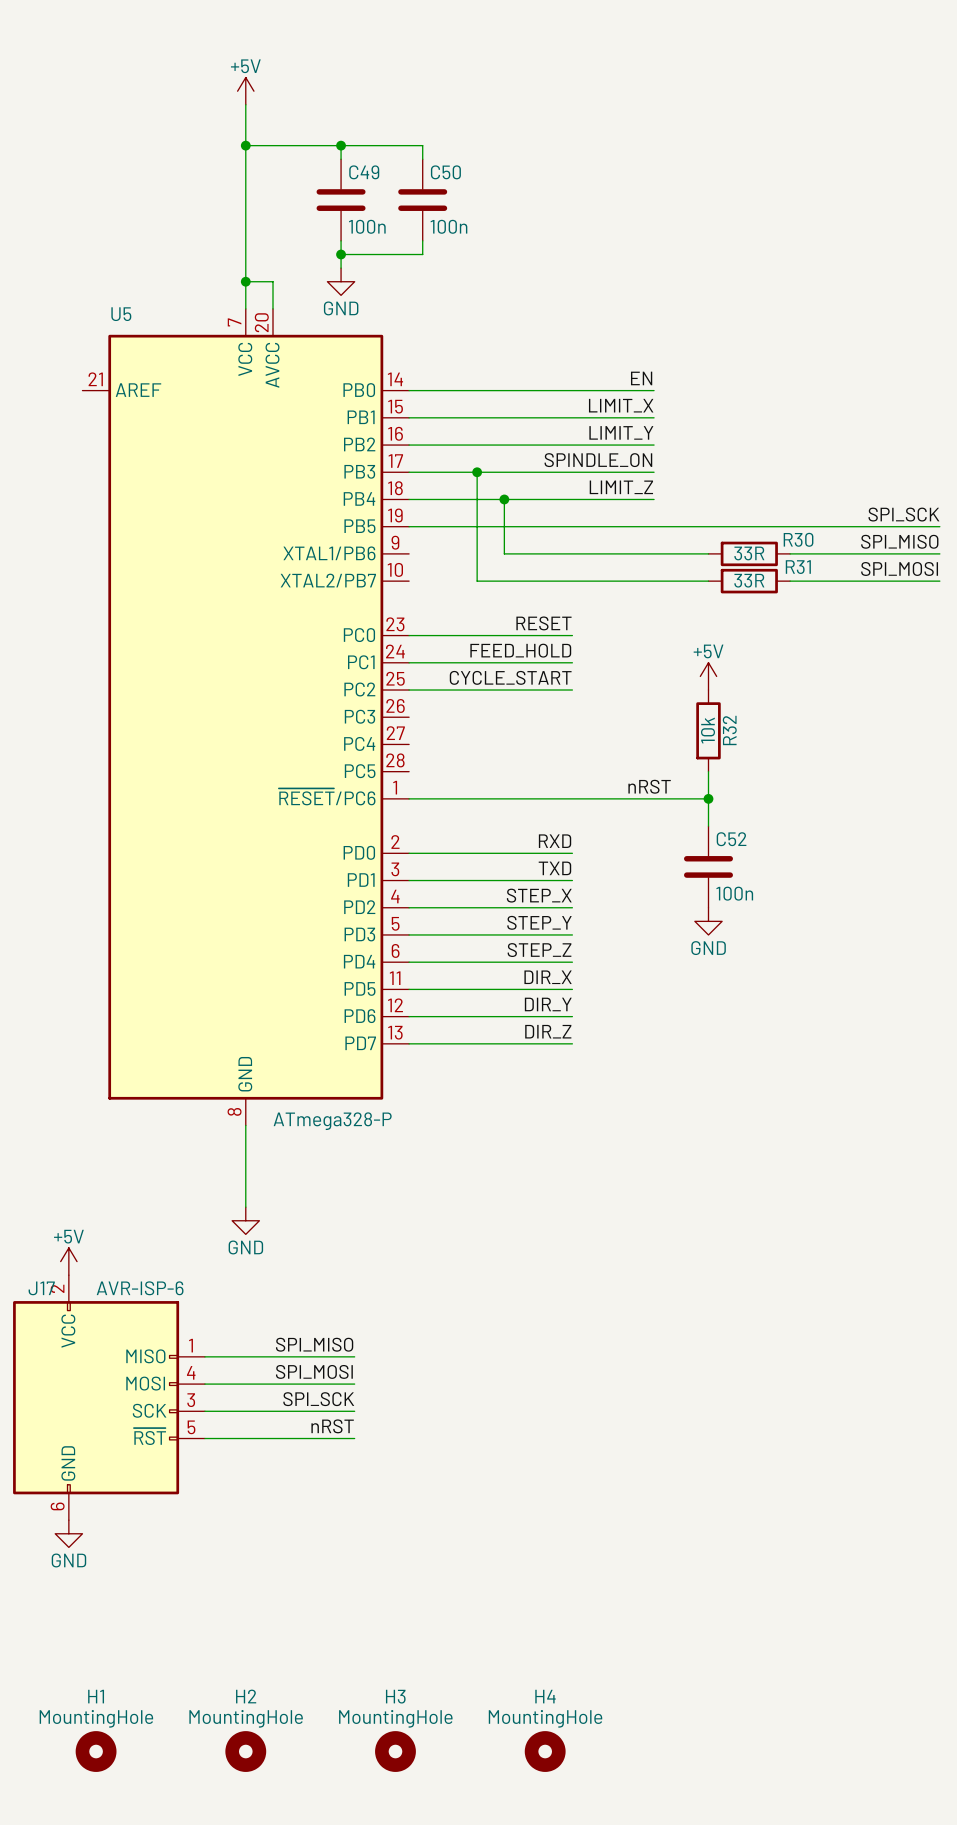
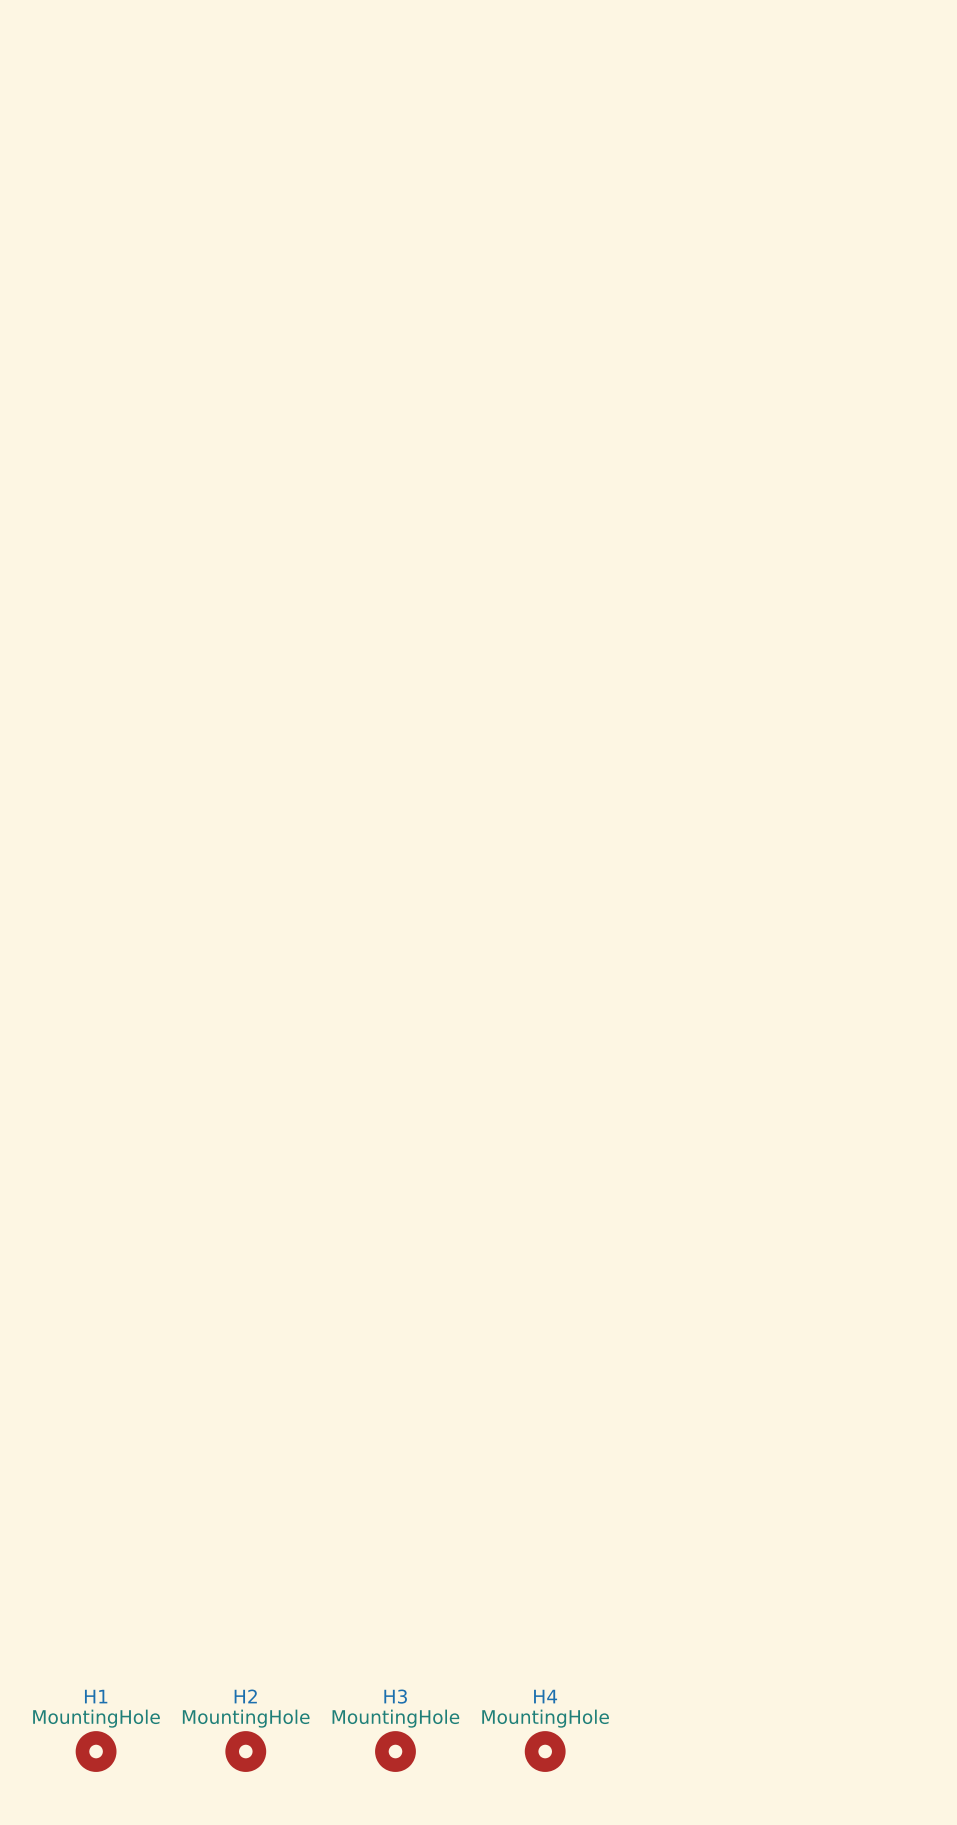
power symbol: +5V (245, 91) -> none
wire: (245, 104) (245, 308) -> none
wire: (245, 145) (422, 145) (422, 159) -> none
junction: (245, 145) -> none
wire: (341, 145) (341, 159) -> none
junction: (341, 145) -> none
C49: 100n (341, 200) -> none
C50: 100n (422, 200) -> none
wire: (341, 240) (341, 268) -> none
wire: (422, 240) (422, 254) (341, 254) -> none
junction: (341, 254) -> none
wire: (245, 281) (273, 281) (273, 308) -> none
junction: (245, 281) -> none
power symbol: GND (341, 281) -> none
label: EN (641, 378) -> none
wire: (409, 390) (654, 390) -> none
label: LIMIT_X (621, 405) -> none
wire: (409, 417) (654, 417) -> none
label: LIMIT_Y (621, 432) -> none
wire: (409, 445) (654, 445) -> none
label: SPINDLE_ON (598, 460) -> none
wire: (409, 472) (654, 472) -> none
wire: (477, 472) (477, 581) (708, 581) -> none
junction: (477, 472) -> none
label: LIMIT_Z (621, 487) -> none
wire: (409, 499) (654, 499) -> none
wire: (504, 499) (504, 553) (708, 553) -> none
junction: (504, 499) -> none
label: SPI_SCK (903, 514) -> none
wire: (409, 526) (939, 526) -> none
label: SPI_MISO (899, 541) -> none
R30: 33R (749, 553) -> none
wire: (790, 553) (939, 553) -> none
label: SPI_MOSI (899, 568) -> none
R31: 33R (749, 581) -> none
wire: (790, 581) (939, 581) -> none
label: RESET (543, 623) -> none
wire: (409, 635) (572, 635) -> none
label: FEED_HOLD (520, 650) -> none
wire: (409, 662) (572, 662) -> none
power symbol: +5V (708, 676) -> none
label: CYCLE_START (510, 677) -> none
wire: (409, 690) (572, 690) -> none
U5: ATmega328-P (245, 717) -> none
R32: 10k (708, 730) -> none
wire: (708, 771) (708, 826) -> none
label: nRST (649, 786) -> none
wire: (409, 798) (708, 798) -> none
junction: (708, 798) -> none
label: RXD (555, 841) -> none
wire: (409, 853) (572, 853) -> none
C52: 100n (708, 866) -> none
label: TXD (554, 868) -> none
wire: (409, 880) (572, 880) -> none
label: STEP_X (539, 895) -> none
wire: (409, 907) (572, 907) -> none
power symbol: GND (708, 921) -> none
label: STEP_Y (539, 922) -> none
wire: (409, 934) (572, 934) -> none
label: STEP_Z (539, 950) -> none
wire: (409, 962) (572, 962) -> none
label: DIR_X (548, 977) -> none
wire: (409, 989) (572, 989) -> none
label: DIR_Y (548, 1004) -> none
wire: (409, 1016) (572, 1016) -> none
label: DIR_Z (548, 1031) -> none
wire: (409, 1043) (572, 1043) -> none
wire: (245, 1125) (245, 1207) -> none
power symbol: GND (245, 1220) -> none
power symbol: +5V (68, 1261) -> none
label: SPI_MISO (314, 1344) -> none
wire: (204, 1356) (354, 1356) -> none
label: SPI_MOSI (314, 1371) -> none
wire: (204, 1384) (354, 1384) -> none
J17: AVR-ISP-6 (109, 1397) -> none
label: SPI_SCK (318, 1399) -> none
wire: (204, 1411) (354, 1411) -> none
label: nRST (332, 1426) -> none
wire: (204, 1438) (354, 1438) -> none
power symbol: GND (68, 1533) -> none

